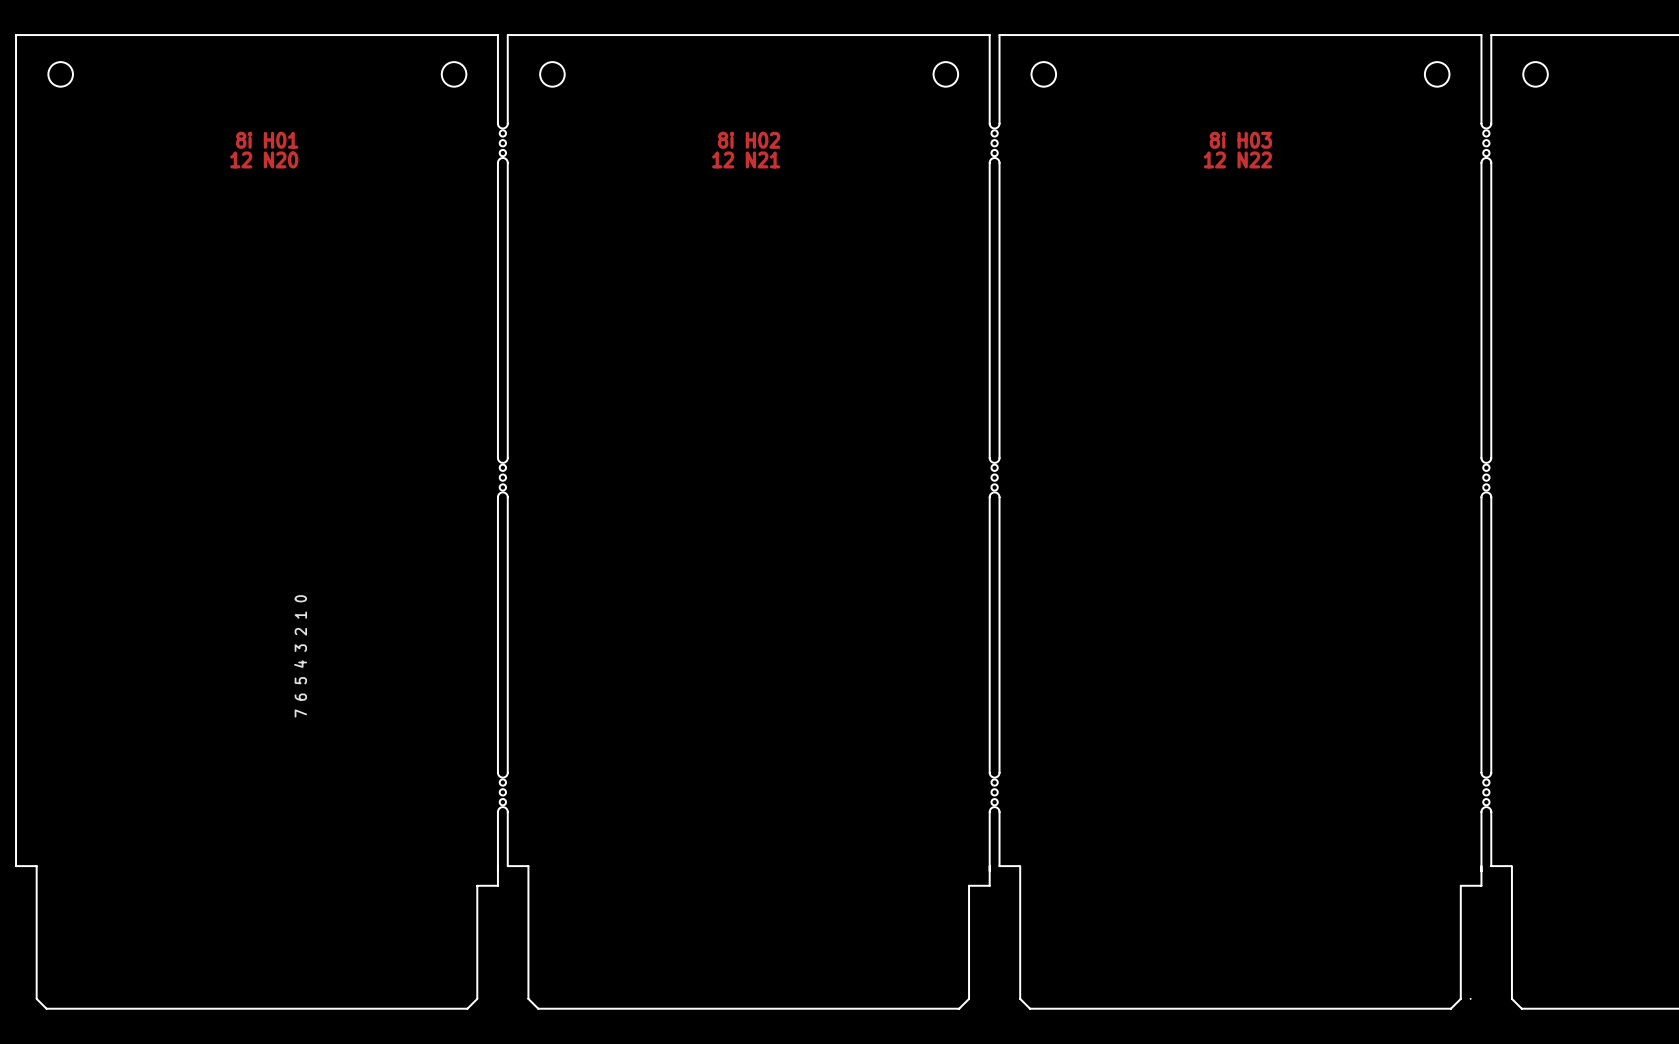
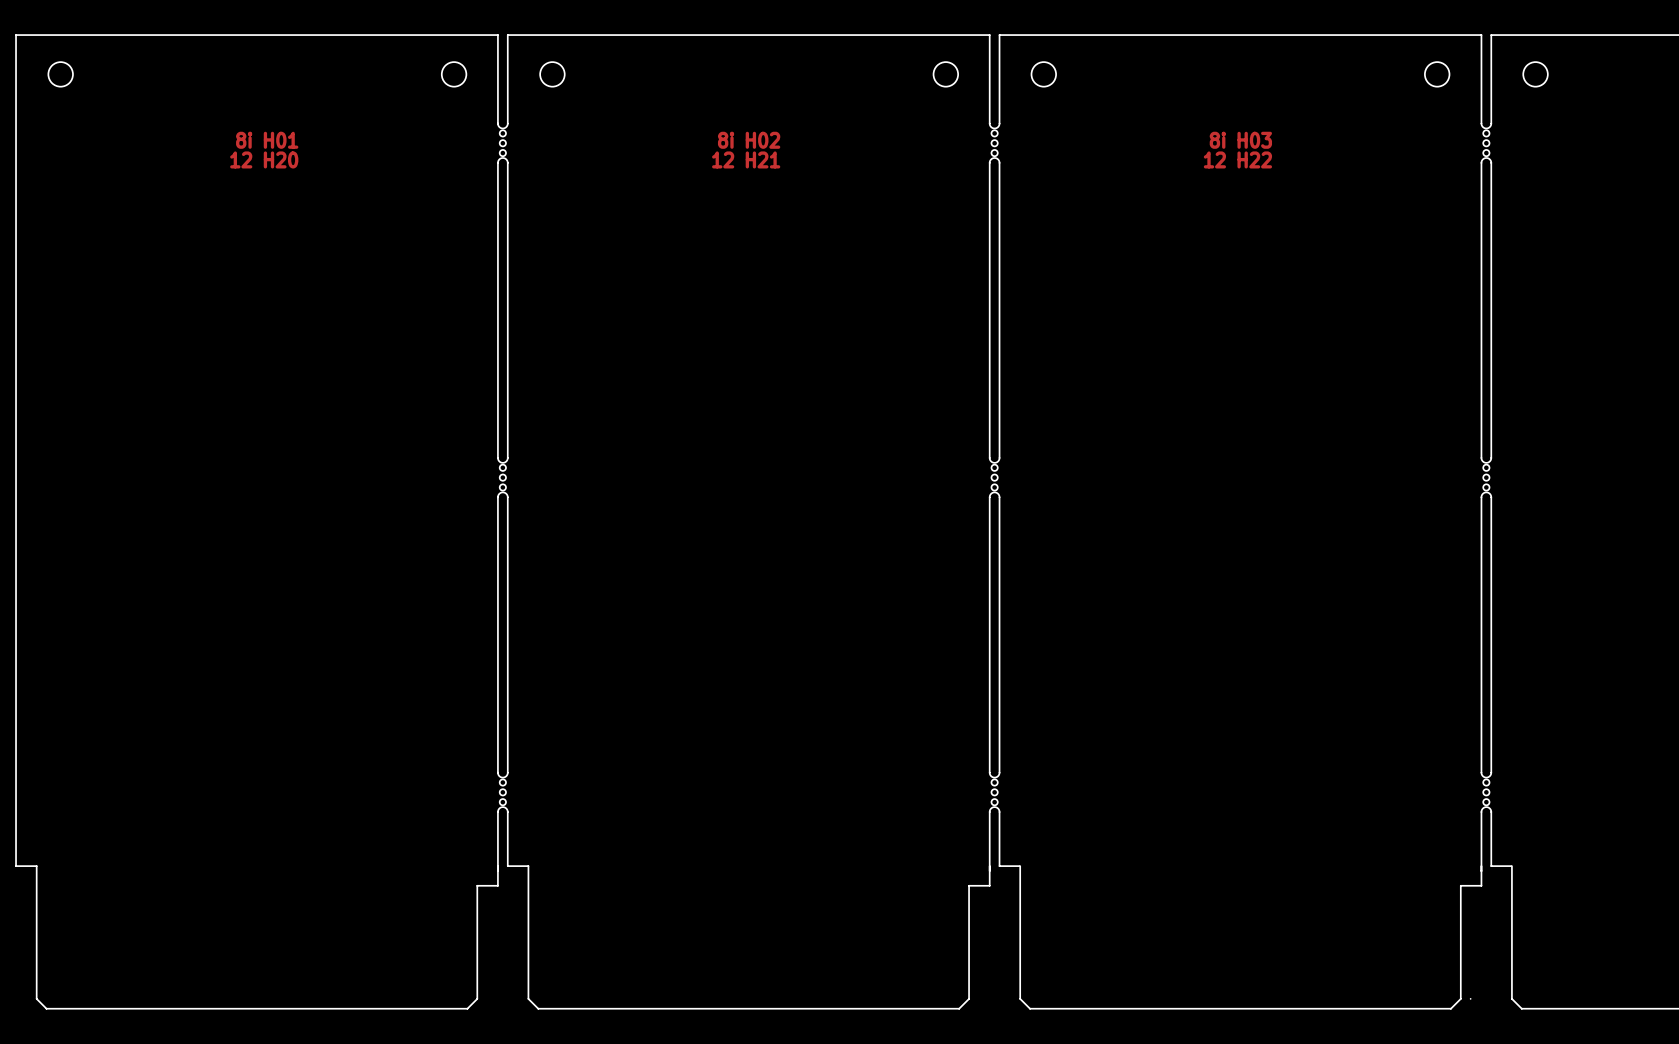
text: 12 N20 (264, 159) -> 12 H20 (264, 159)
text: 12 N21 (746, 159) -> 12 H21 (746, 159)
text: 12 N22 (1237, 159) -> 12 H22 (1237, 159)
text: 7 6 5 4 3 2 1 0 (300, 656) -> none

